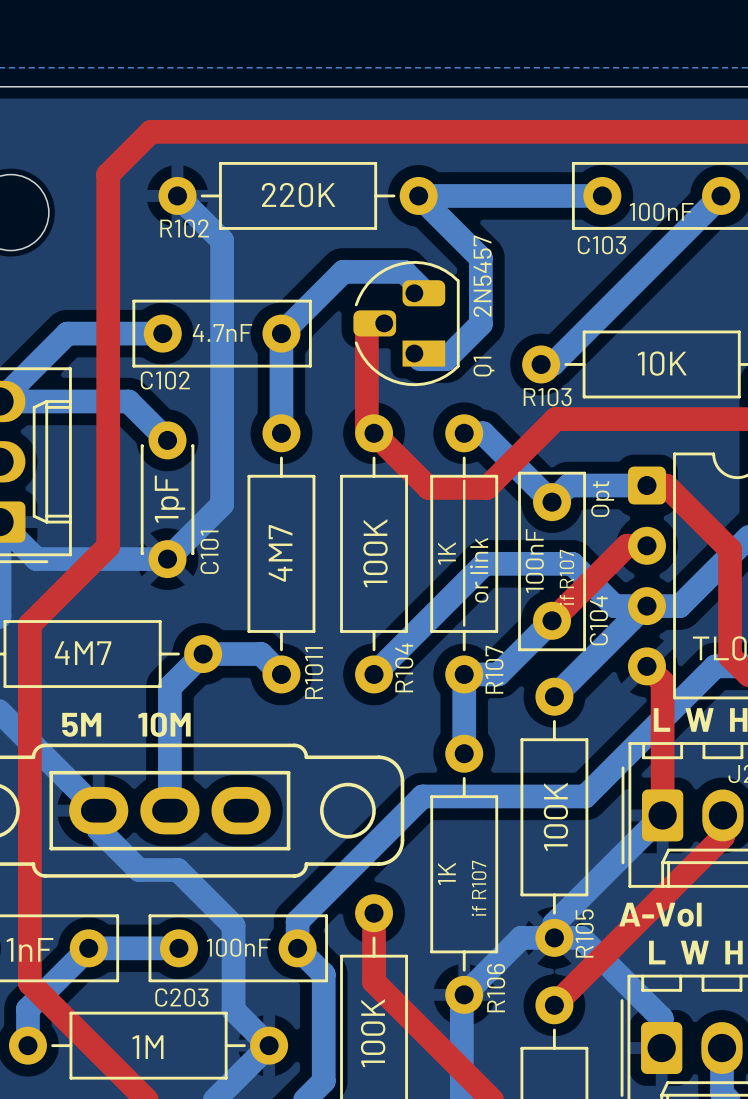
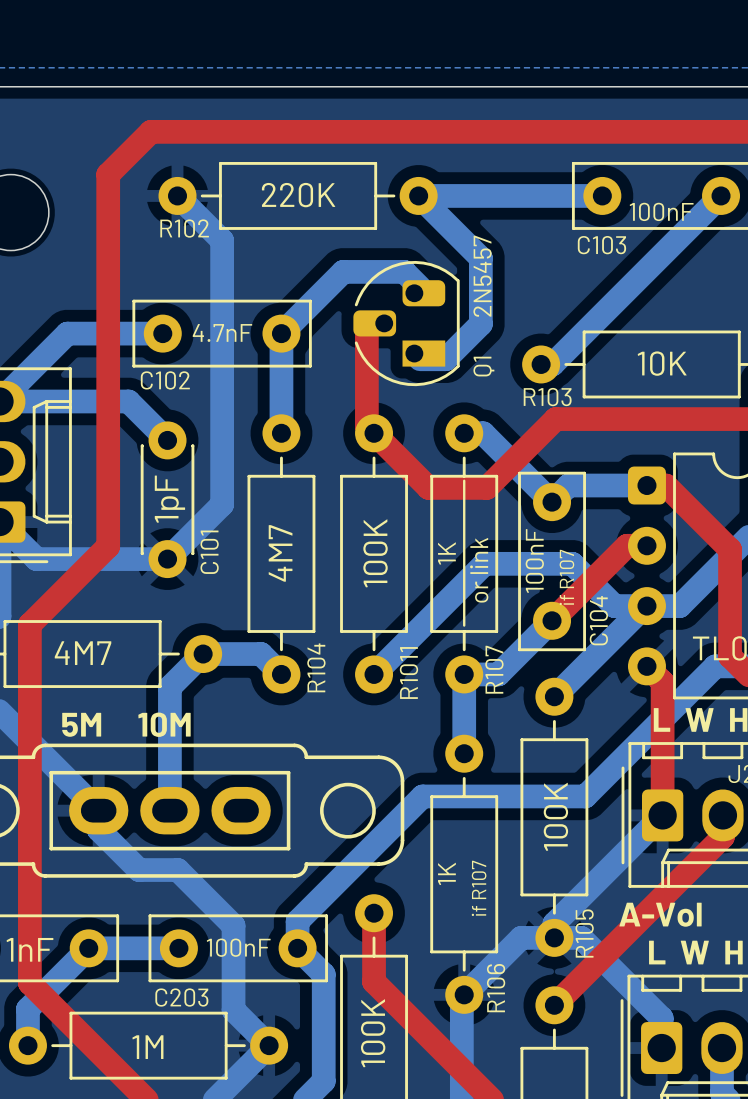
text: Opt (602, 498) -> none
R104 name position: R104 (404, 667) -> R104 (316, 667)
R1011 name position: R1011 (314, 673) -> R1011 (408, 673)

